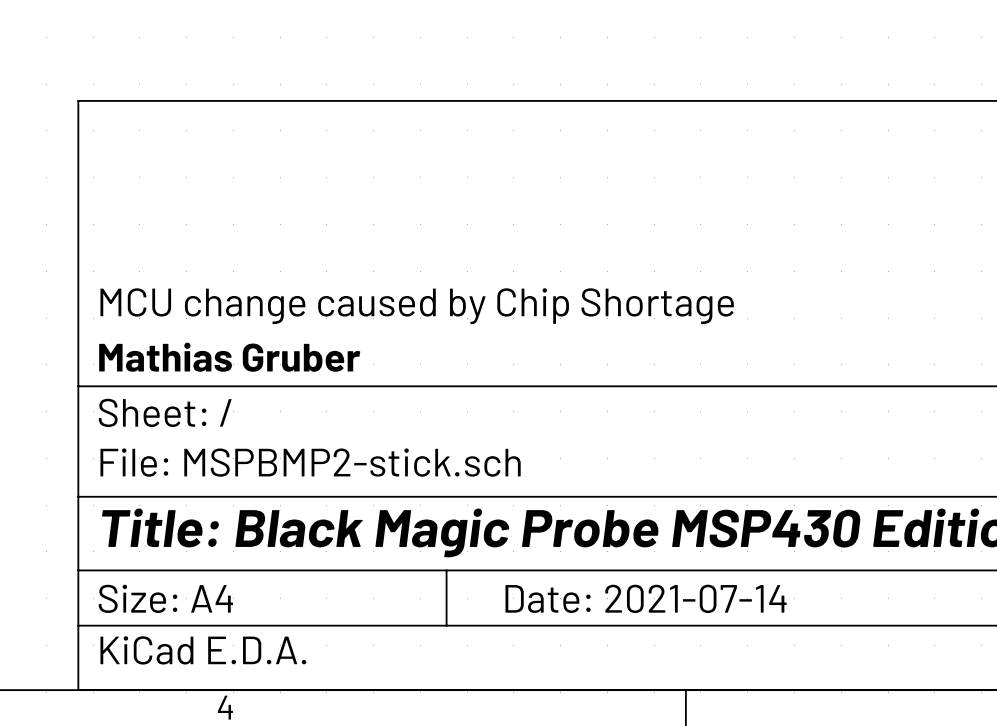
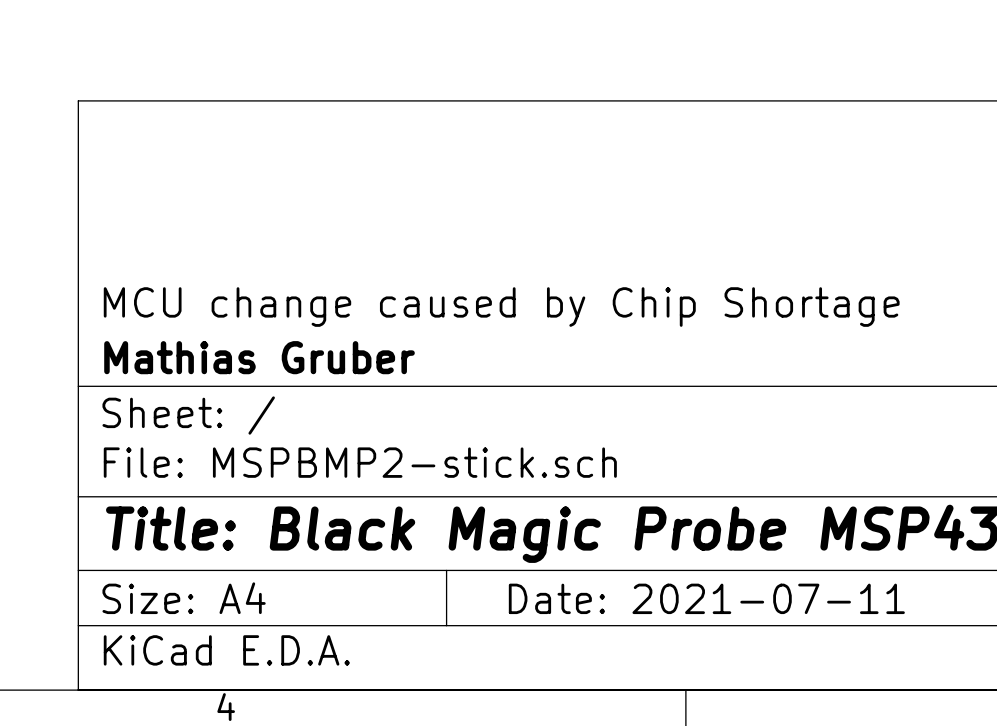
title block: Date: 2021-07-14 (646, 598) -> Date: 2021-07-11 (706, 598)

